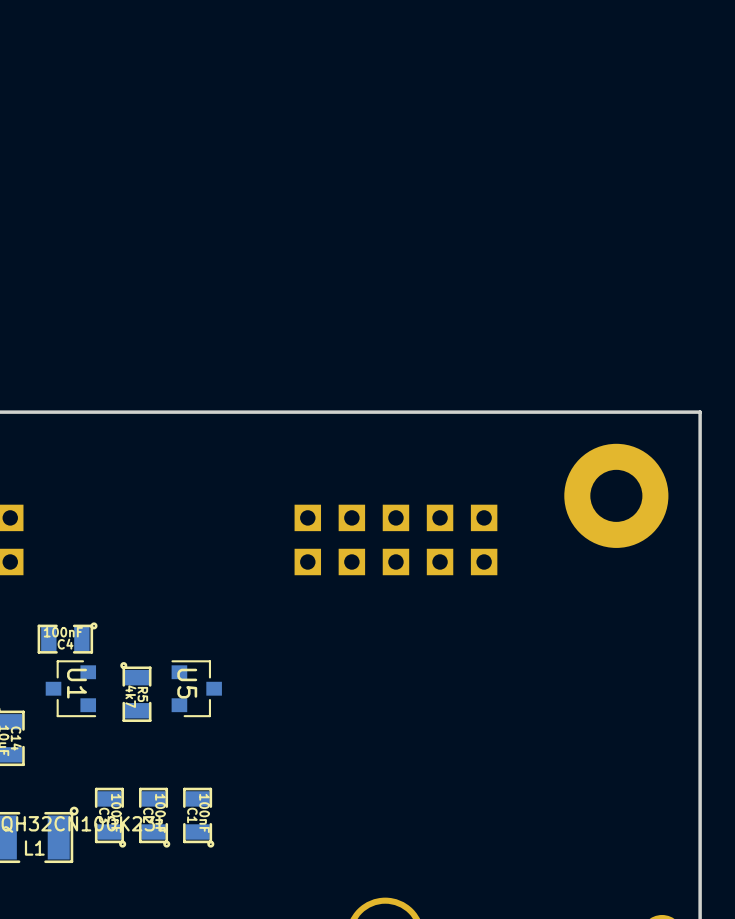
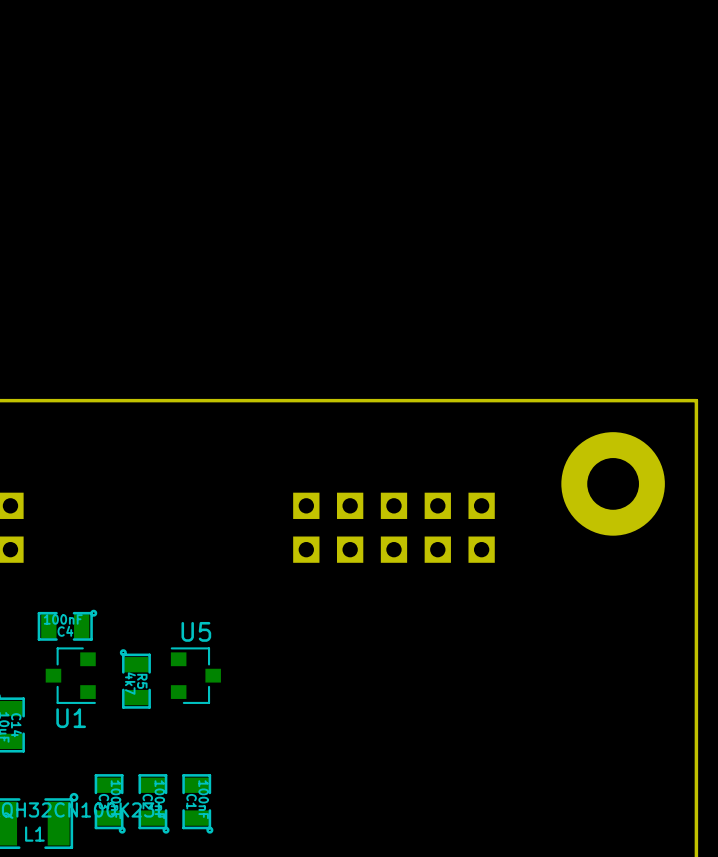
U1 name rotation: 0° (77, 683) -> 90° counterclockwise (71, 718)
U1 name position: U1 (77, 683) -> U1 (71, 718)
U5 name rotation: 0° (187, 683) -> 90° counterclockwise (196, 631)

